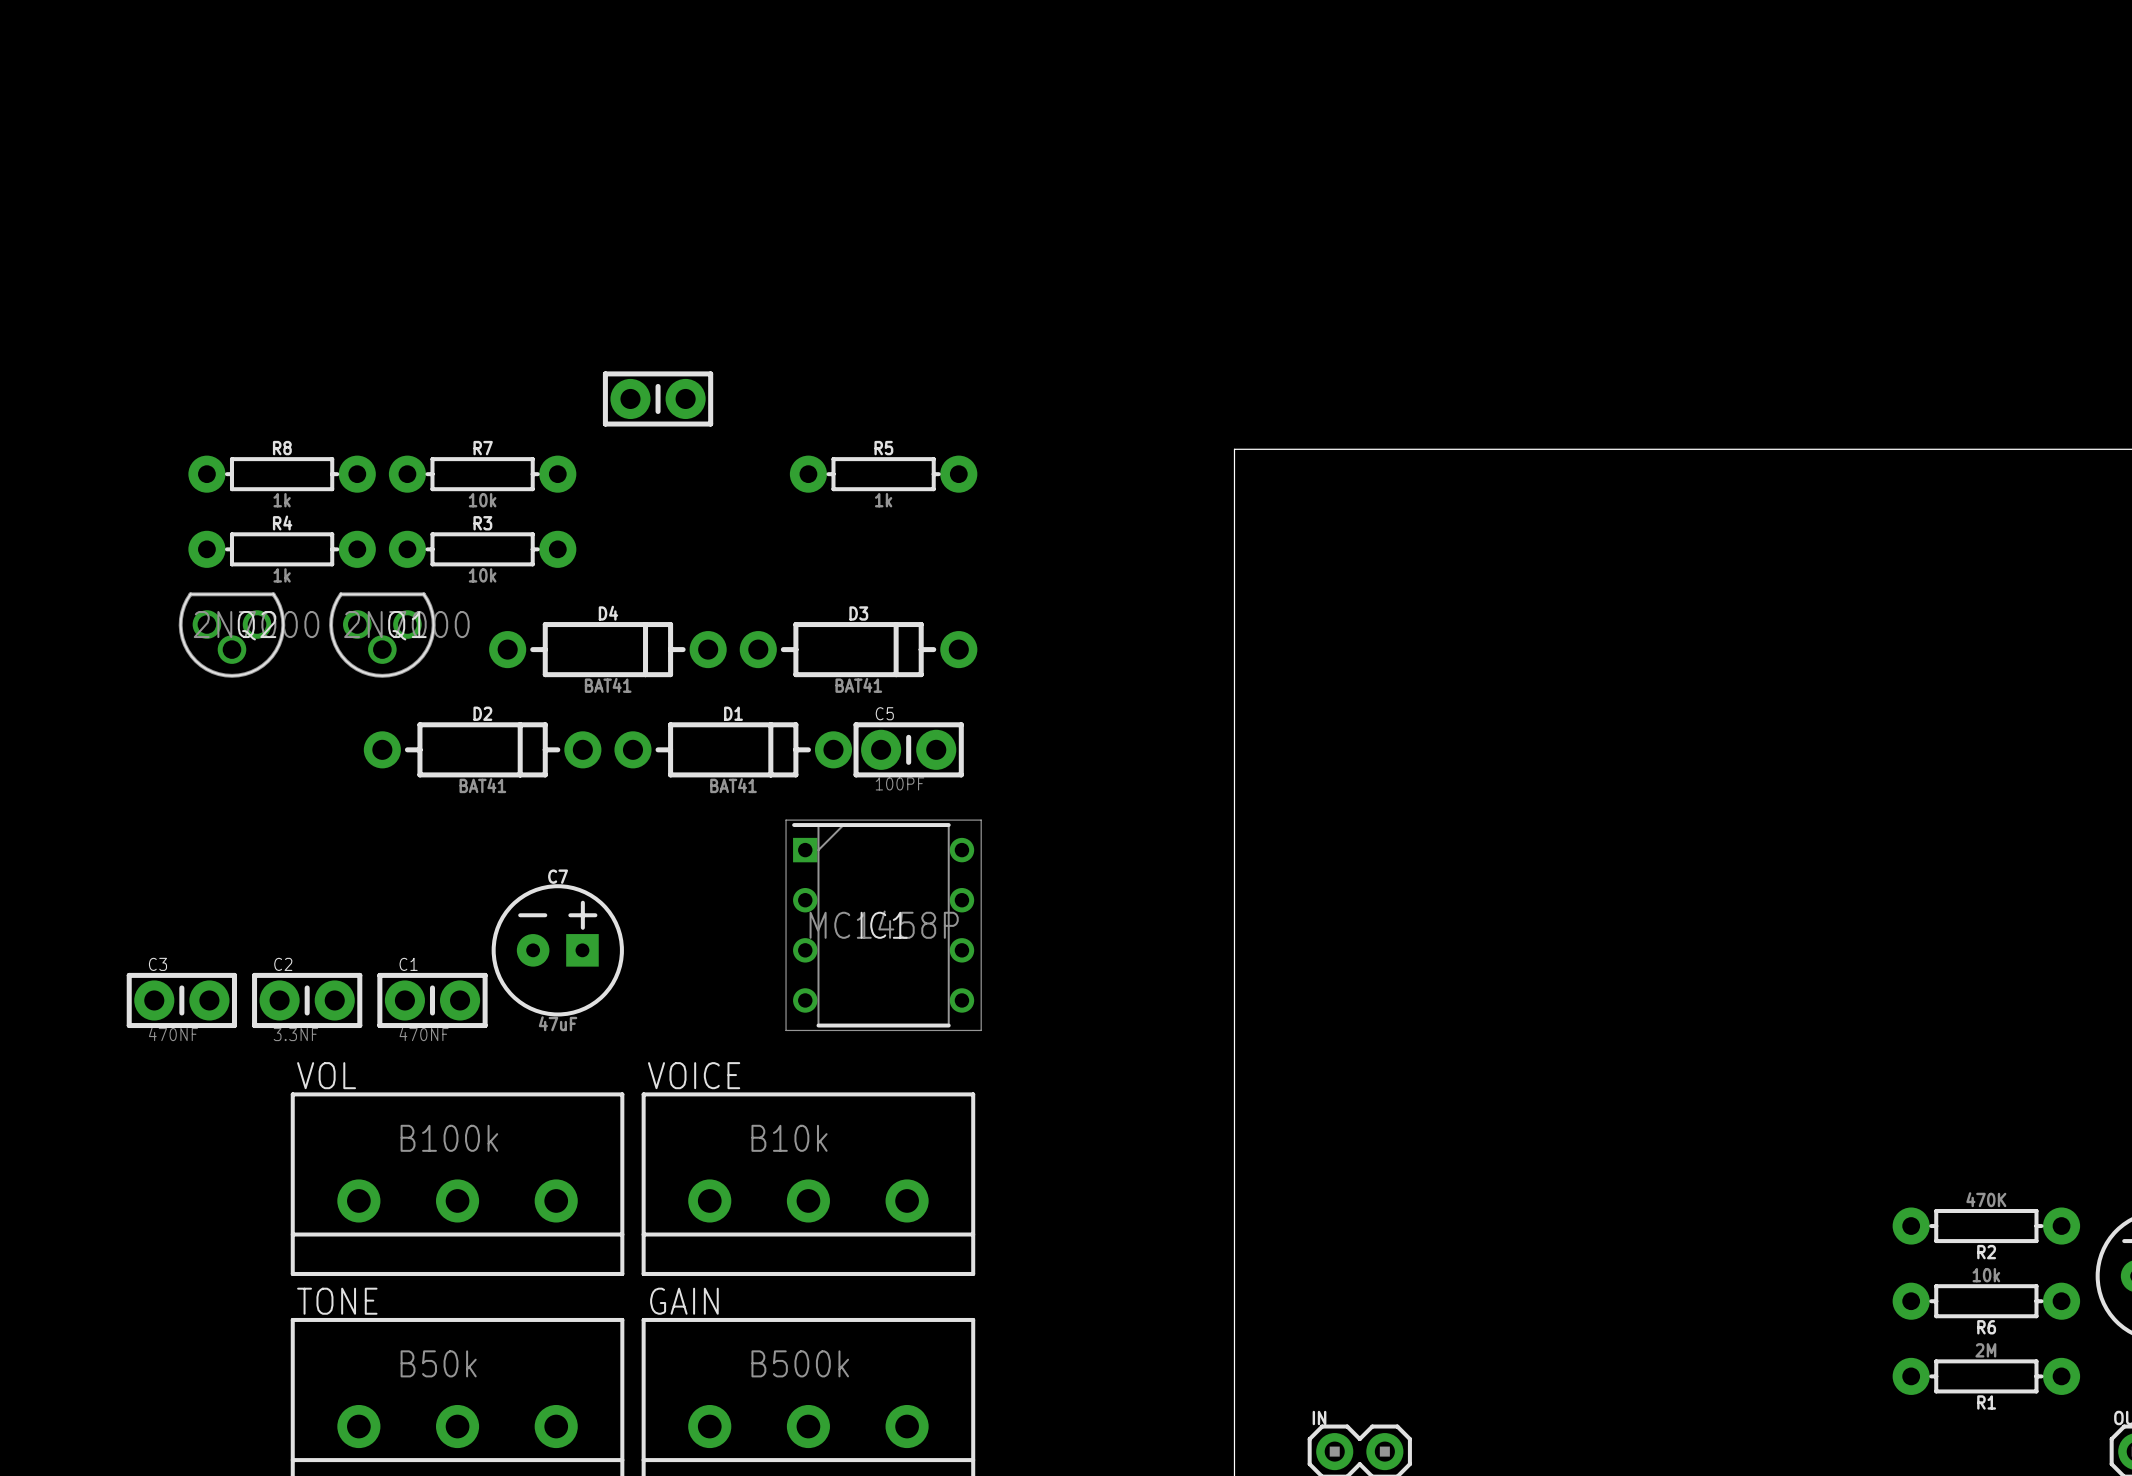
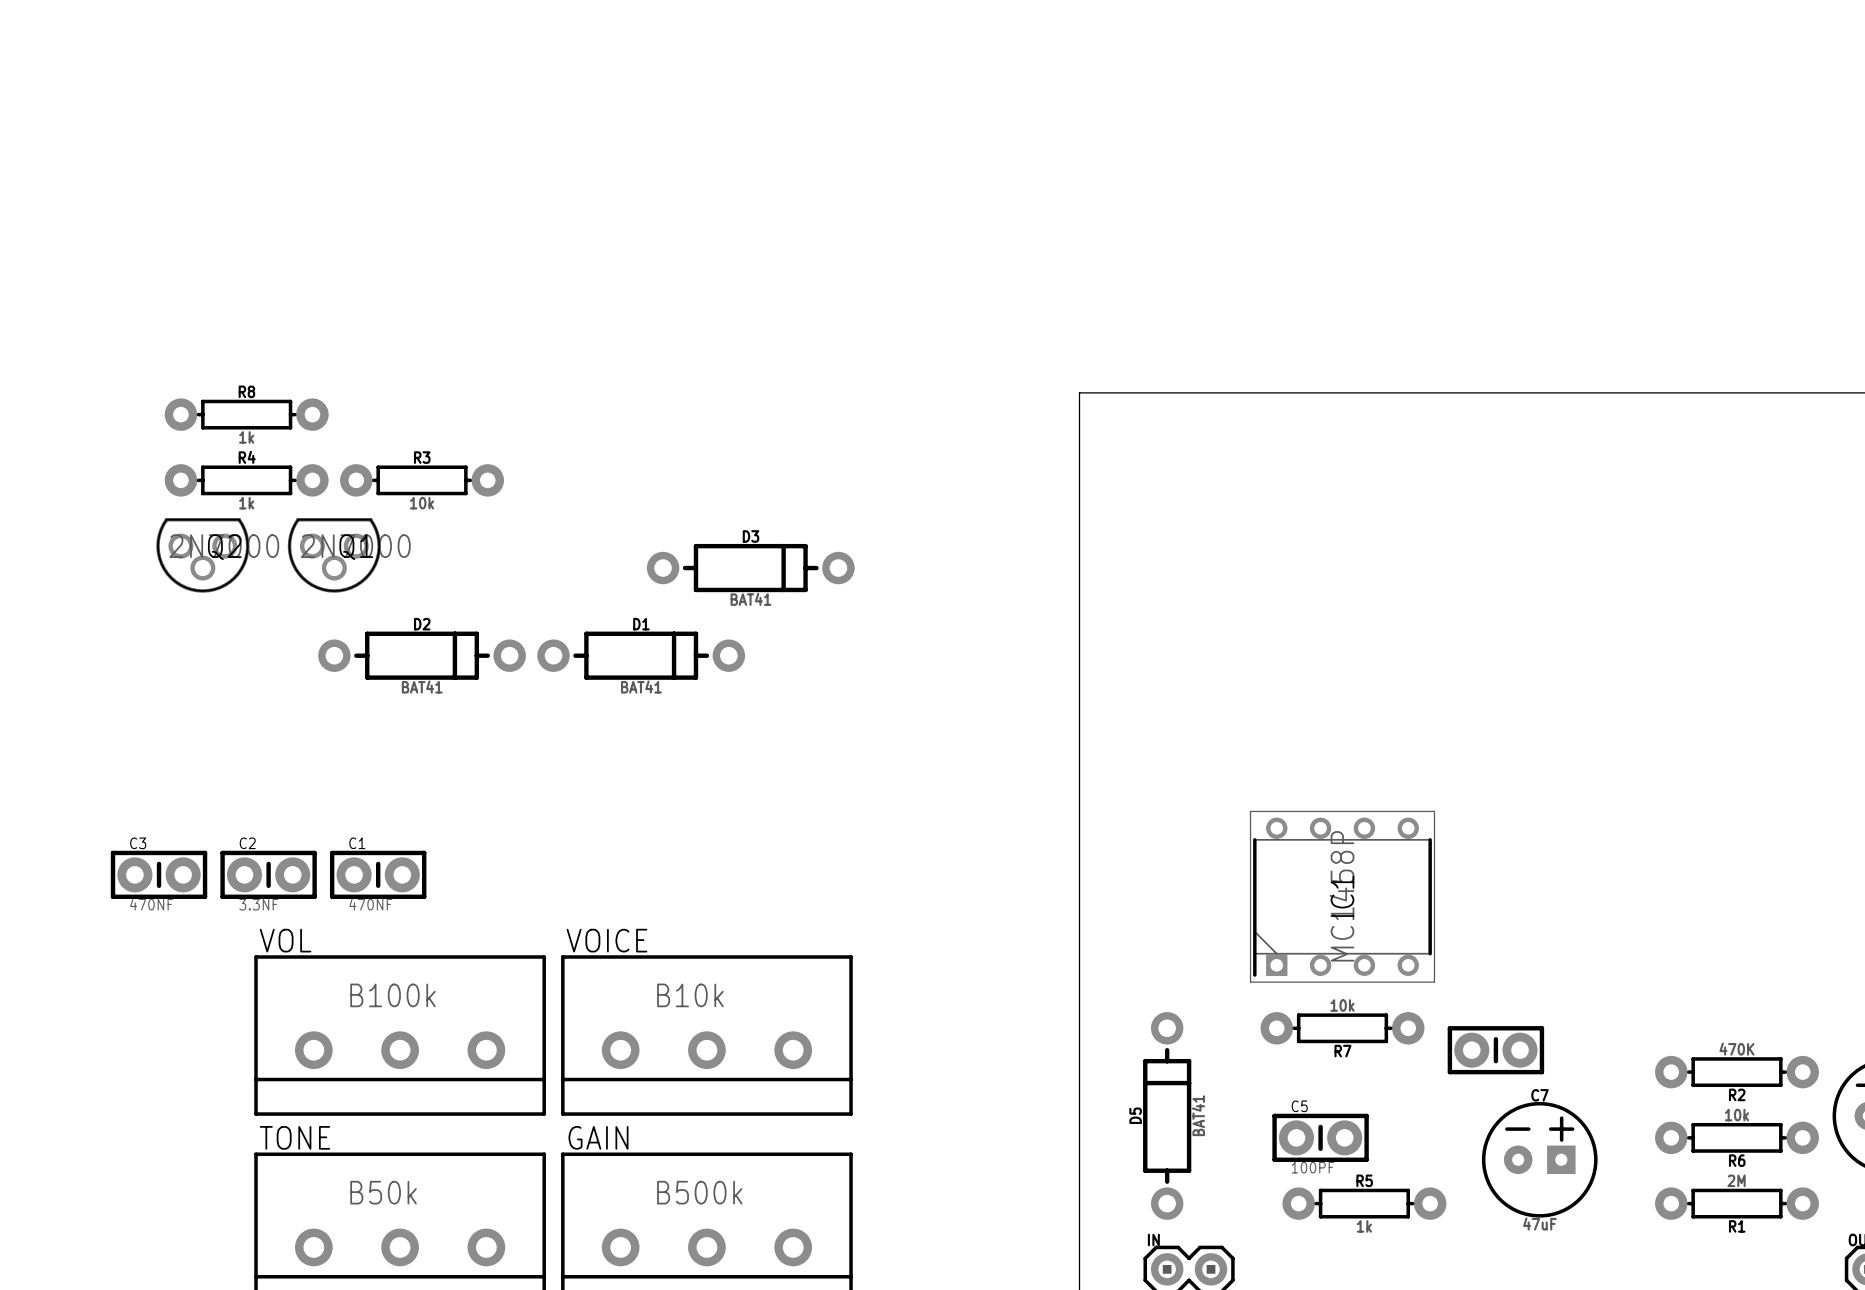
part: (658, 398) -> none
R7 name position: R7 (483, 448) -> R7 (1342, 1051)
R7 position: (482, 474) -> (1342, 1028)
R5 position: (883, 474) -> (1364, 1203)
R7 value position: 10k (482, 500) -> 10k (1342, 1005)
D4: BAT41 (607, 649) -> none
C5 position: (908, 749) -> (1320, 1137)
IC1 rotation: 0° (883, 925) -> 90° counterclockwise (1342, 896)
IC1 position: (883, 925) -> (1342, 896)
C7 position: (557, 950) -> (1539, 1159)
part: none -> (1495, 1050)
D5: none -> BAT41 (1167, 1115)

